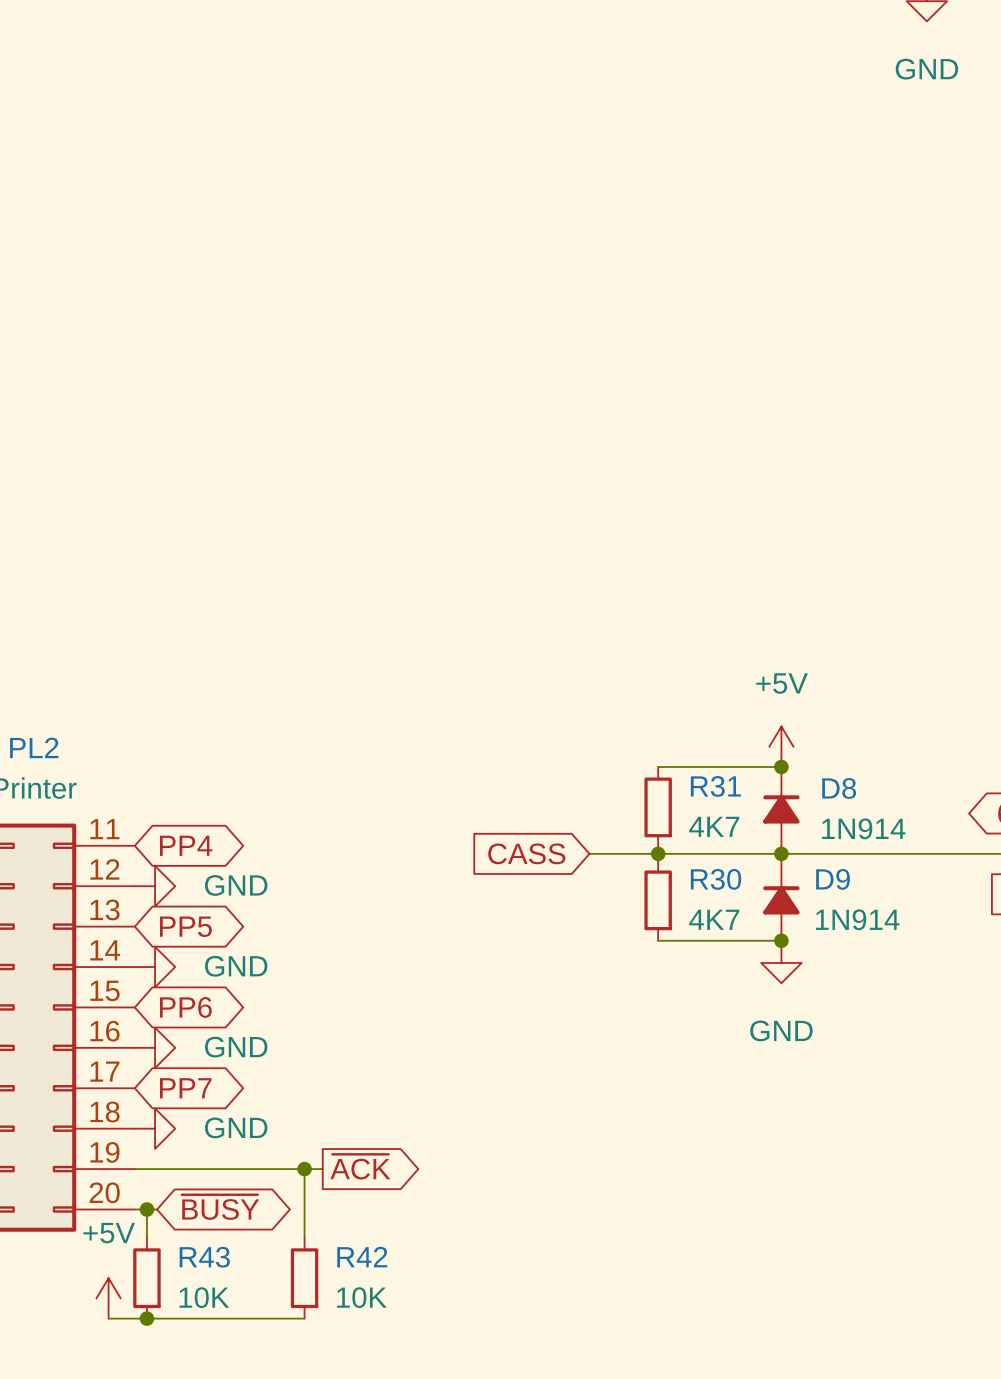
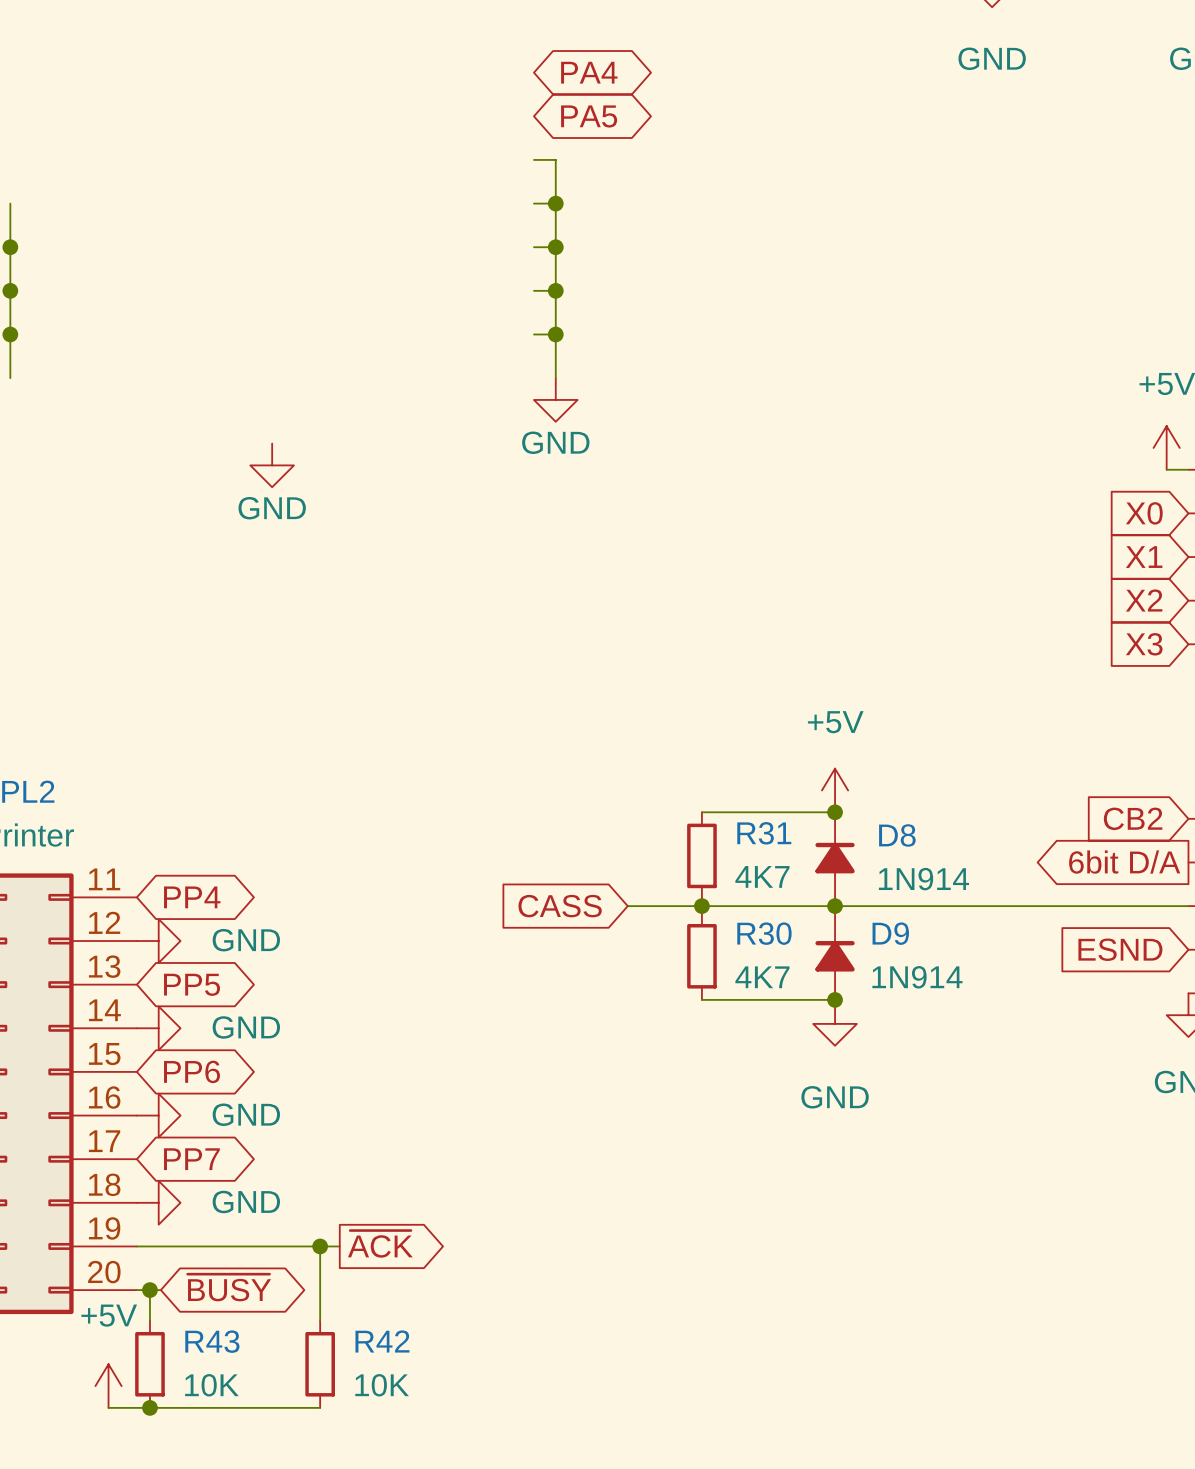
global label: none -> PA4 (589, 72)
global label: none -> PA5 (589, 116)
wire: none -> (533, 159) (555, 159) (555, 378)
wire: none -> (10, 203) (10, 378)
wire: none -> (533, 203) (555, 203)
junction: none -> (555, 203)
junction: none -> (10, 247)
wire: none -> (533, 247) (555, 247)
junction: none -> (555, 247)
junction: none -> (10, 290)
wire: none -> (533, 290) (555, 290)
junction: none -> (555, 290)
junction: none -> (10, 334)
wire: none -> (533, 334) (555, 334)
junction: none -> (555, 334)
power symbol: none -> GND (555, 399)
power symbol: none -> GND (272, 465)

